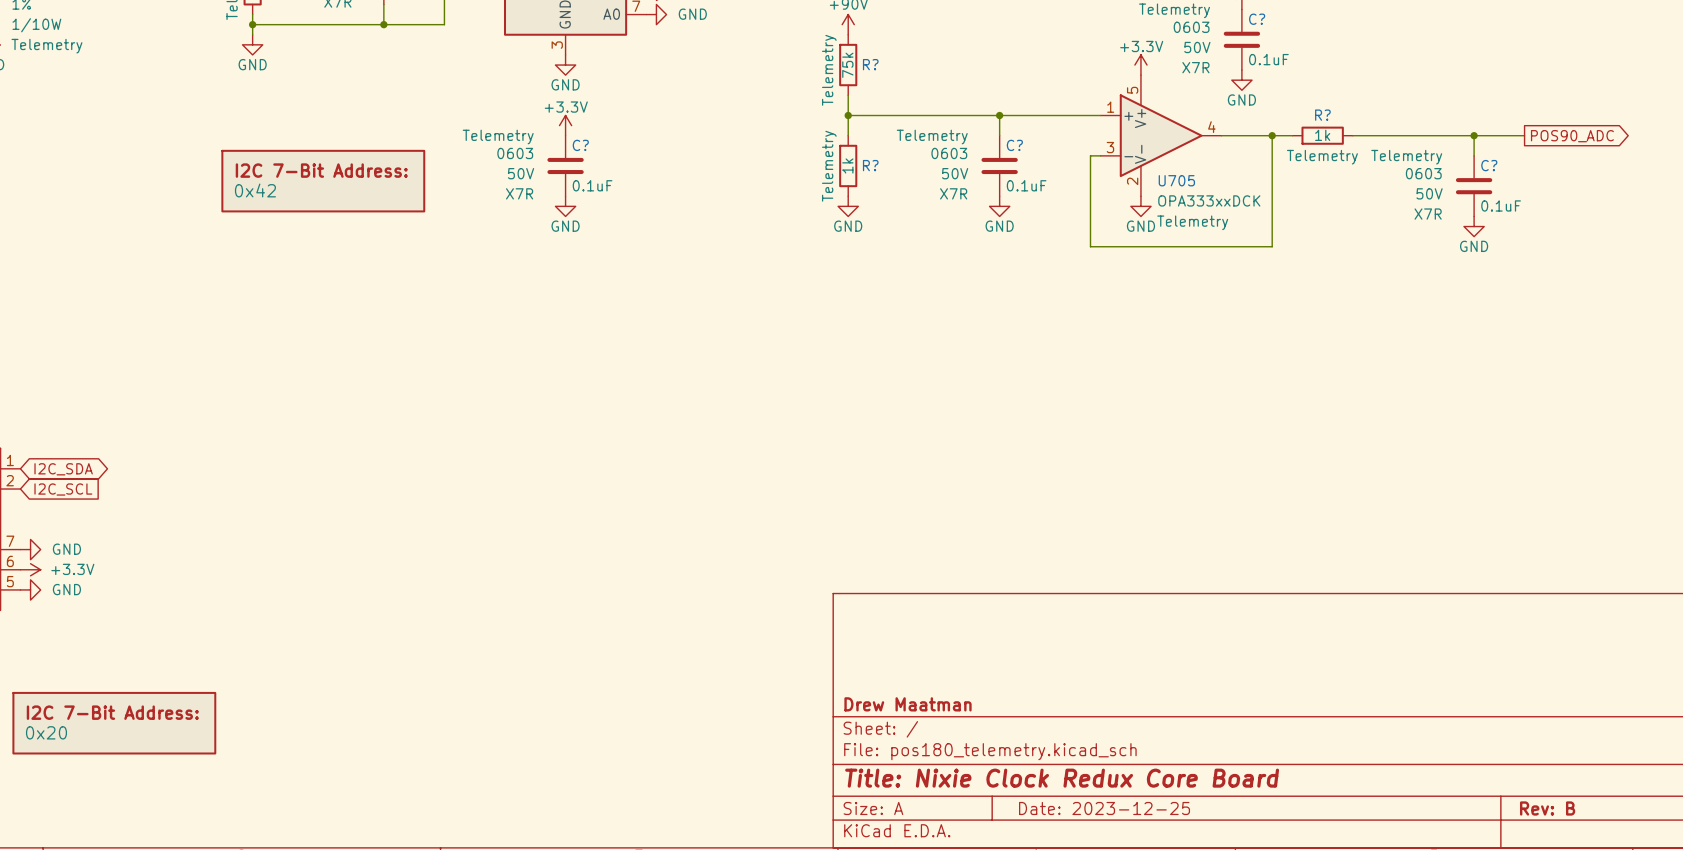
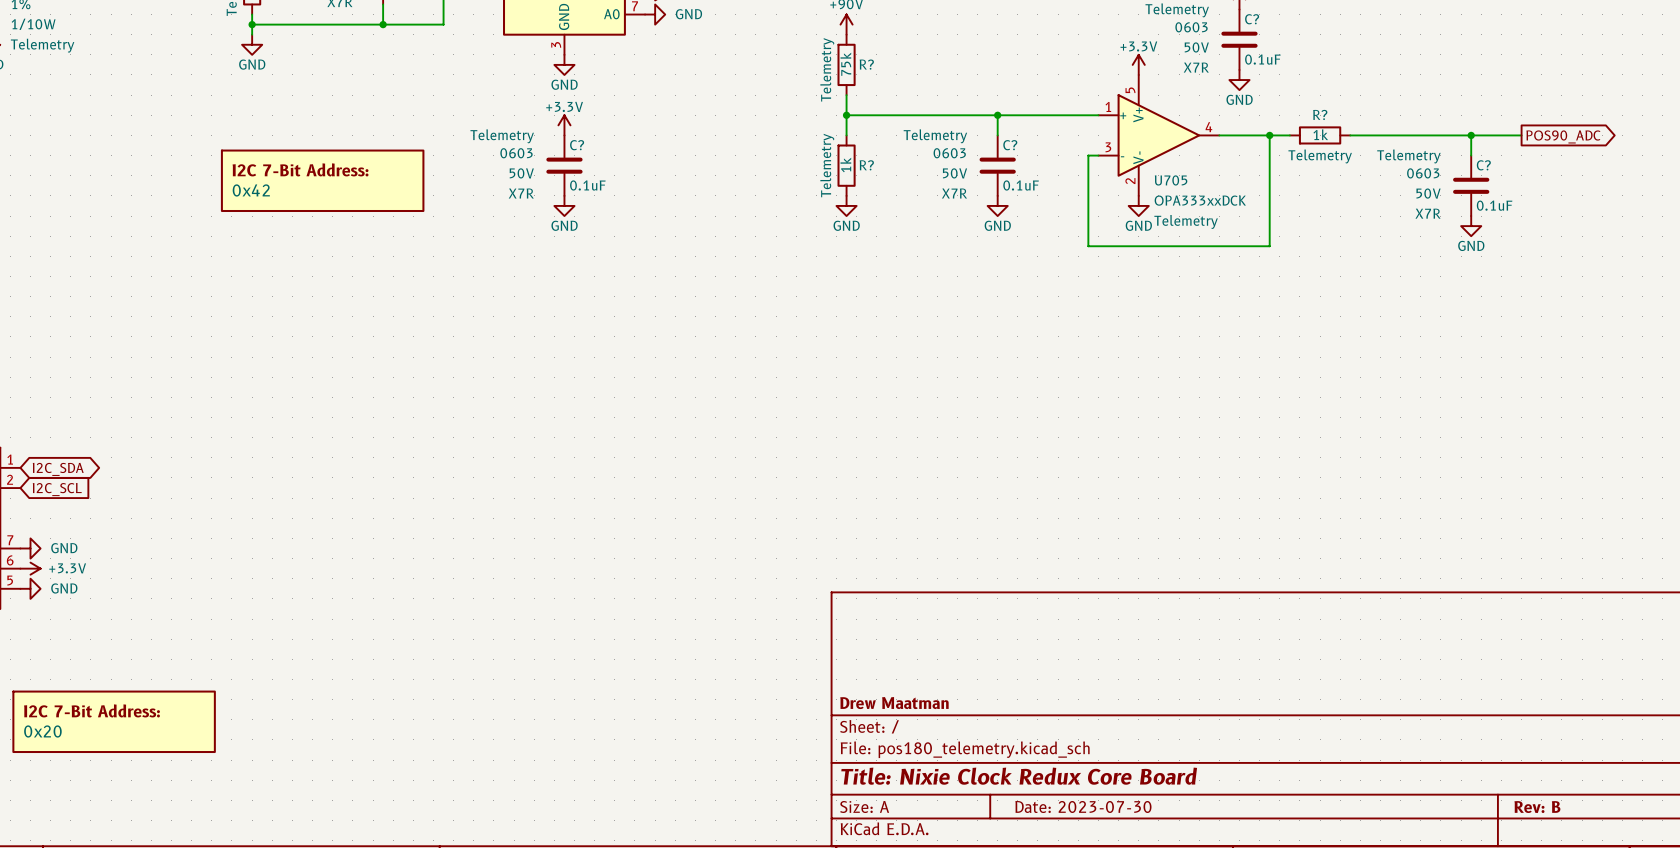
title block: Date: 2023-12-25 (1104, 808) -> Date: 2023-07-30 (1083, 806)

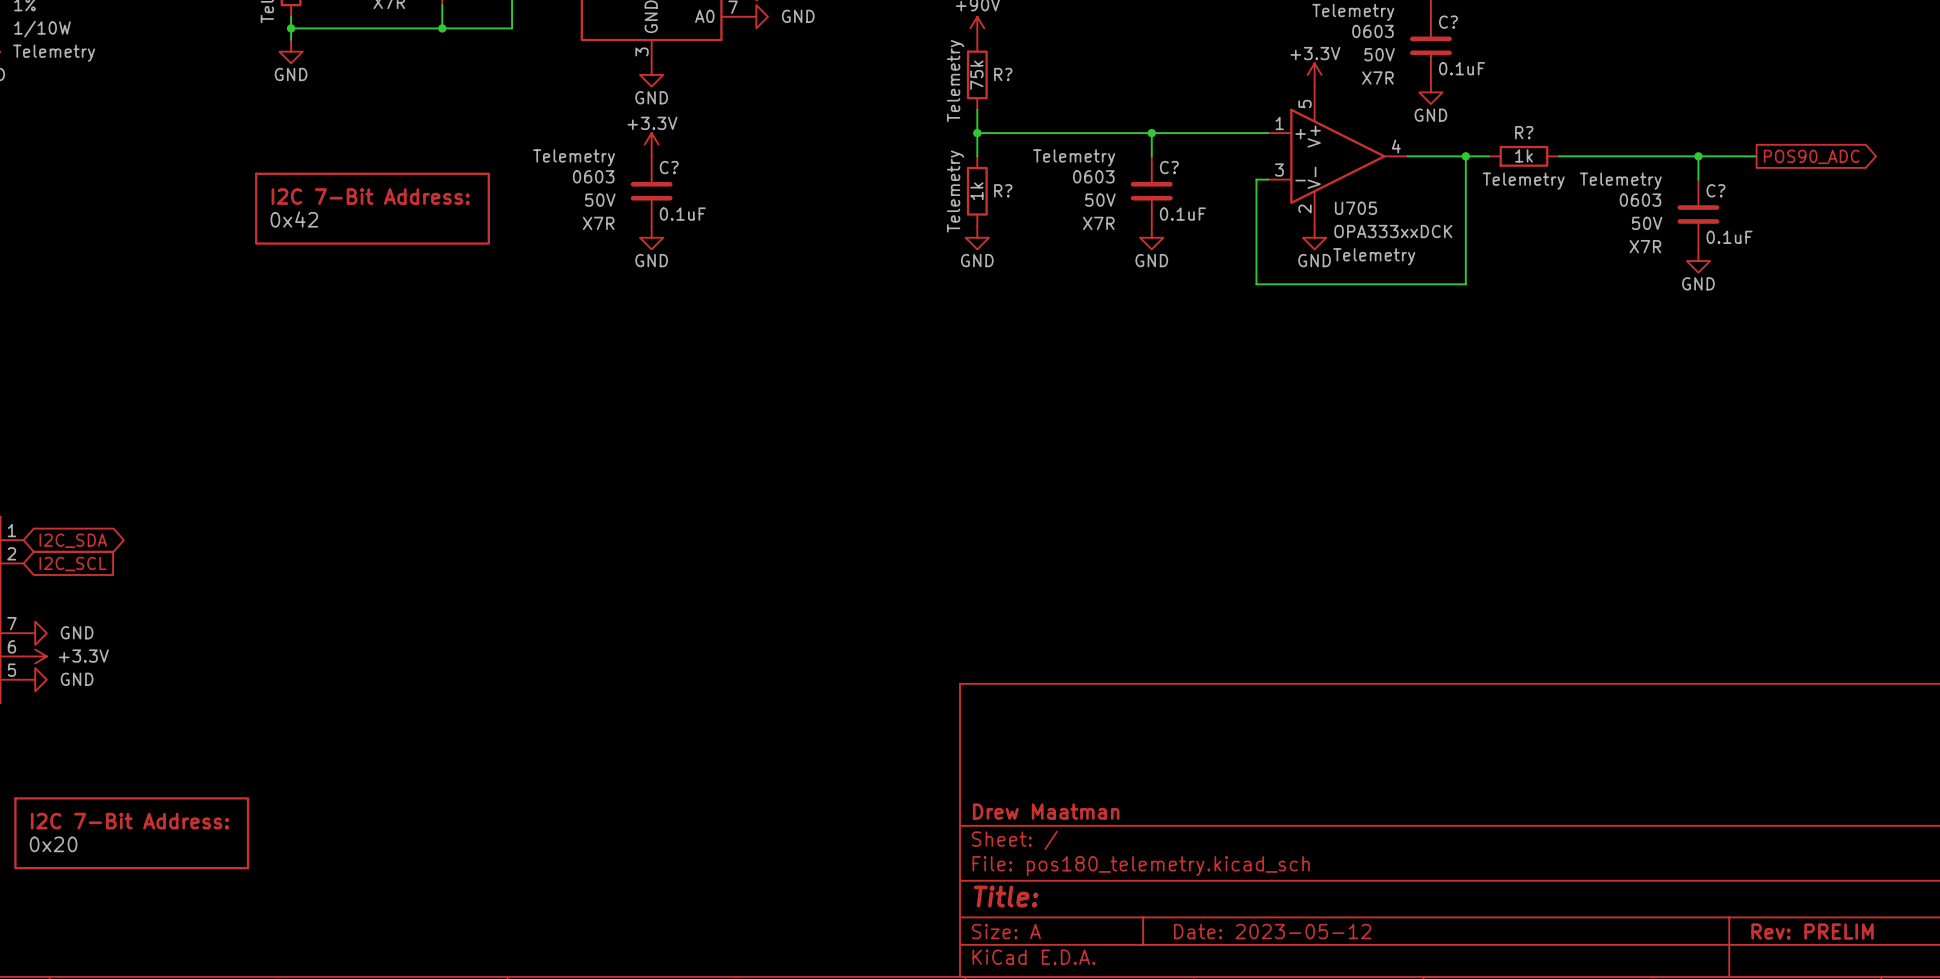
title block: Title: Nixie Clock Redux Core Board (1019, 776) -> Title: (1006, 896)
title block: Date: 2023-07-30 (1083, 806) -> Date: 2023-05-12 (1272, 931)
title block: Rev: B (1537, 807) -> Rev: PRELIM (1812, 931)

